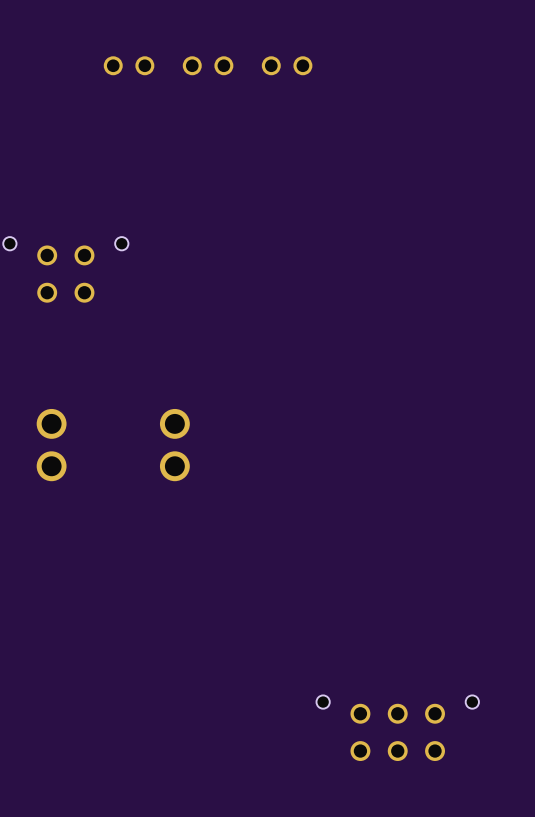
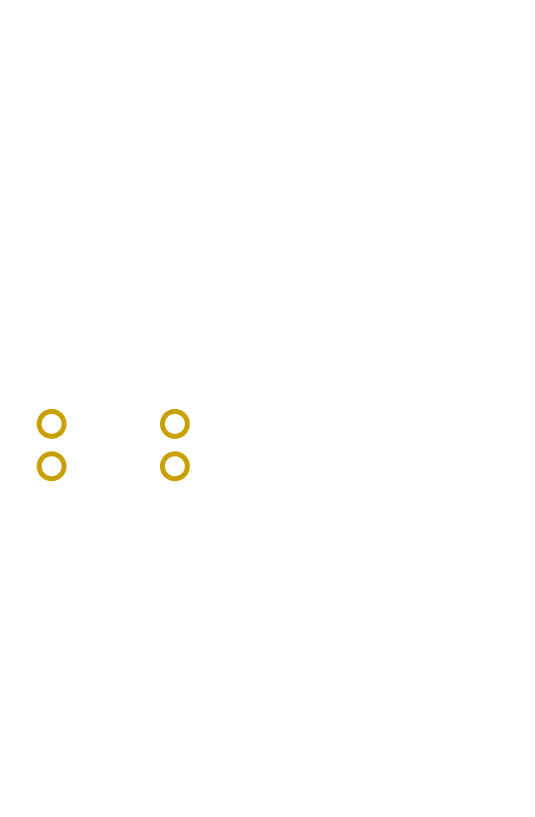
part: (129, 65) -> none
part: (208, 65) -> none
part: (287, 65) -> none
part: (65, 269) -> none
part: (397, 728) -> none

